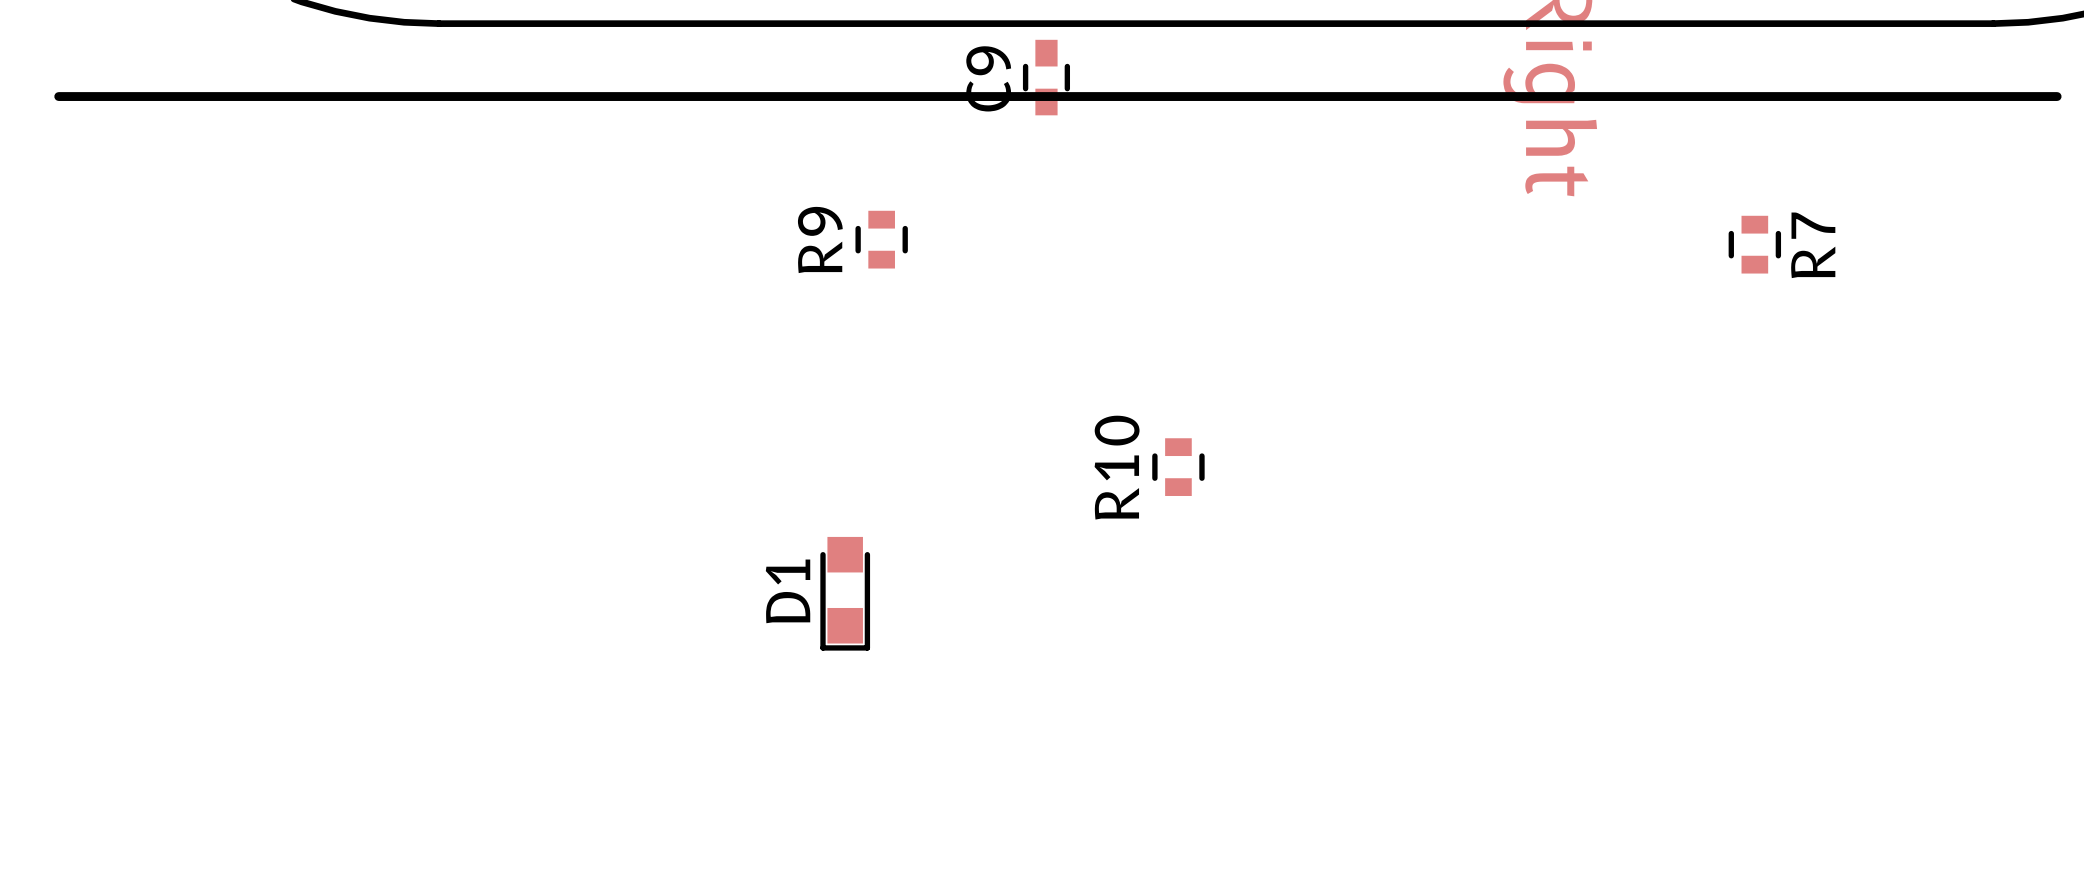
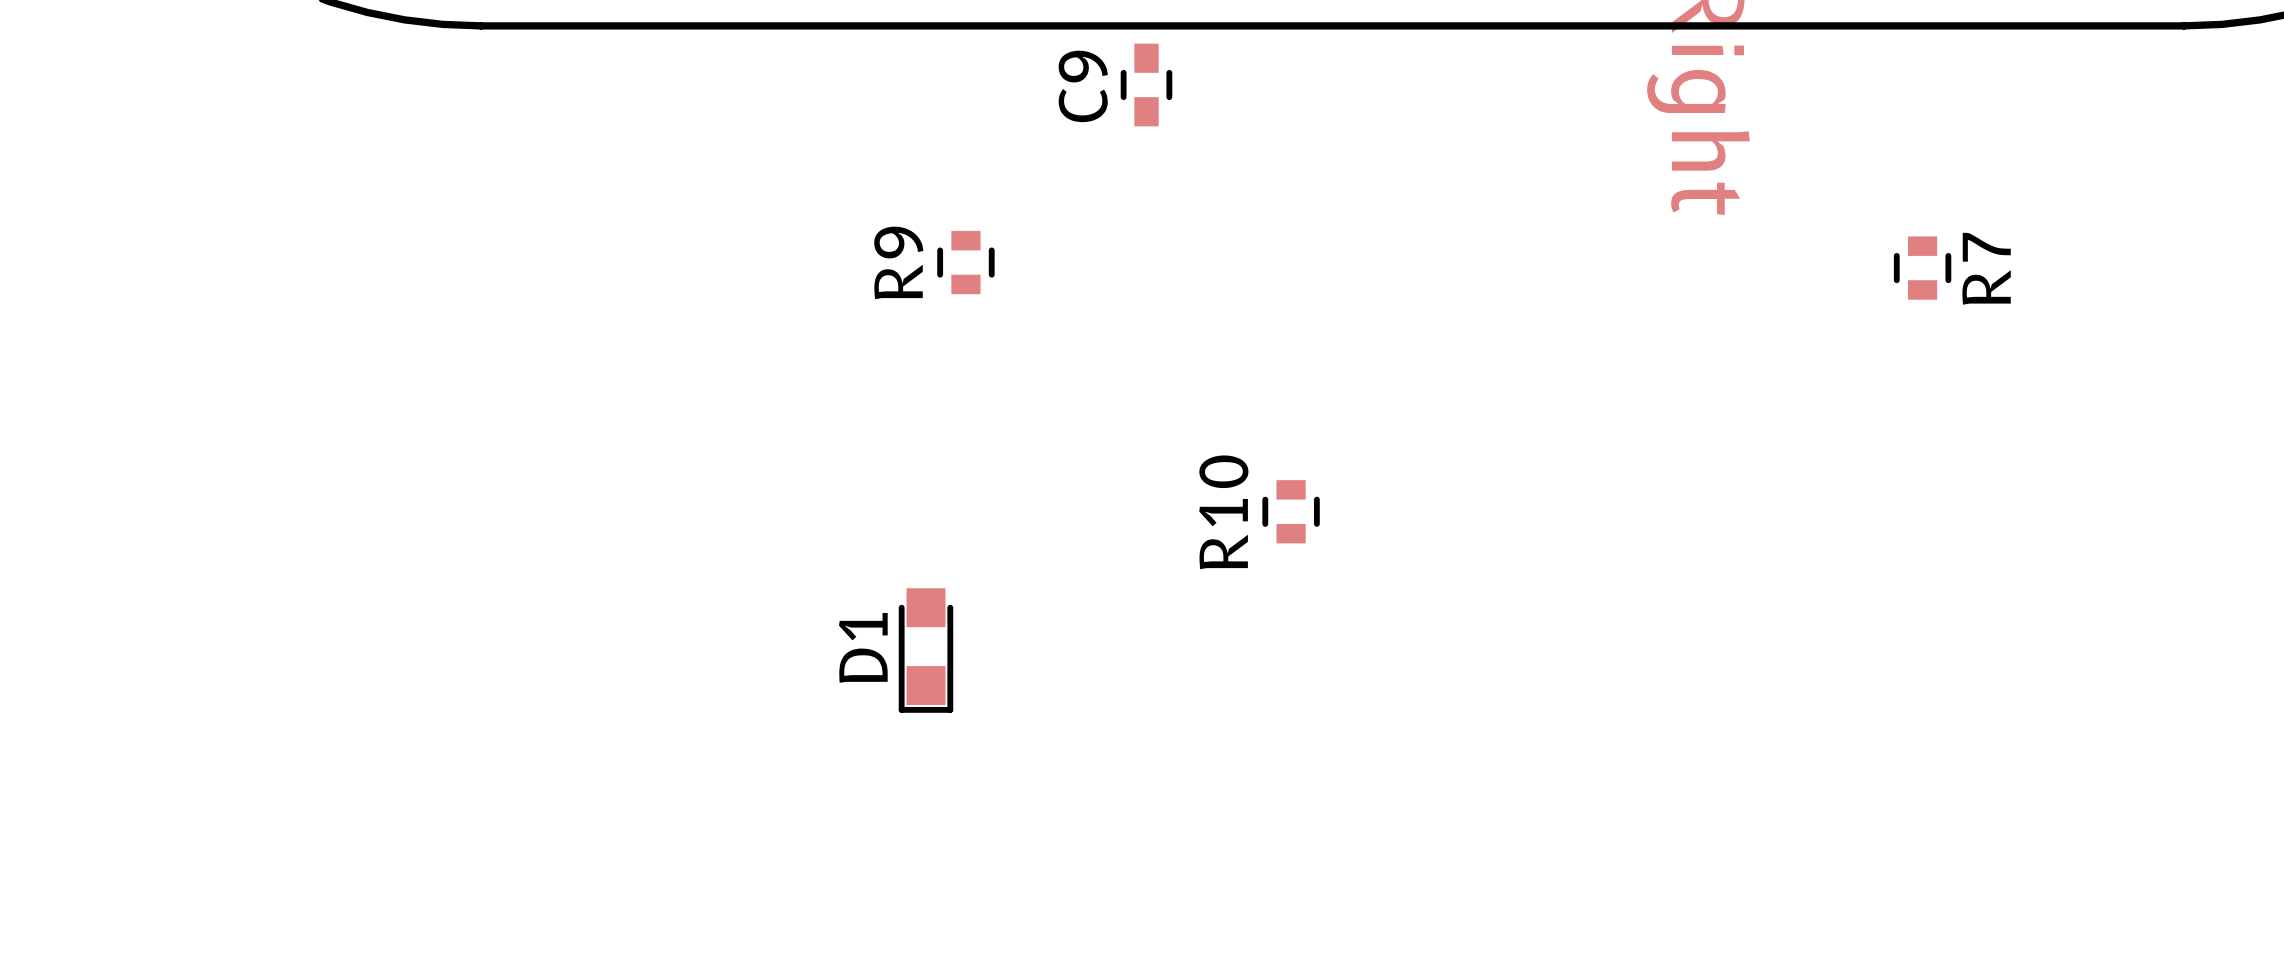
line: (58, 96) (2057, 96) -> none

